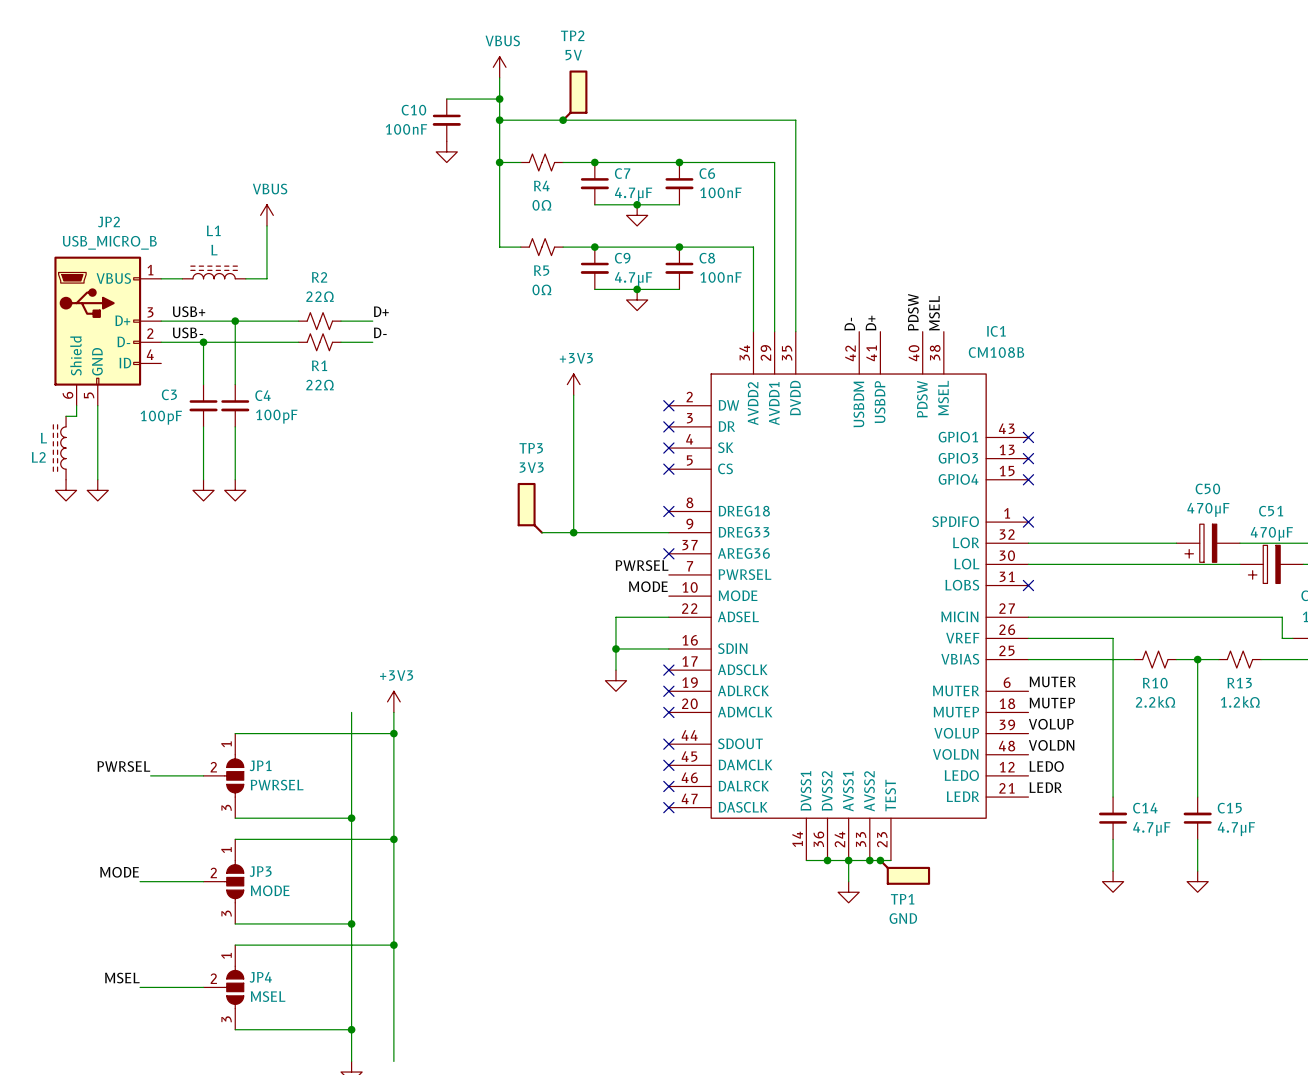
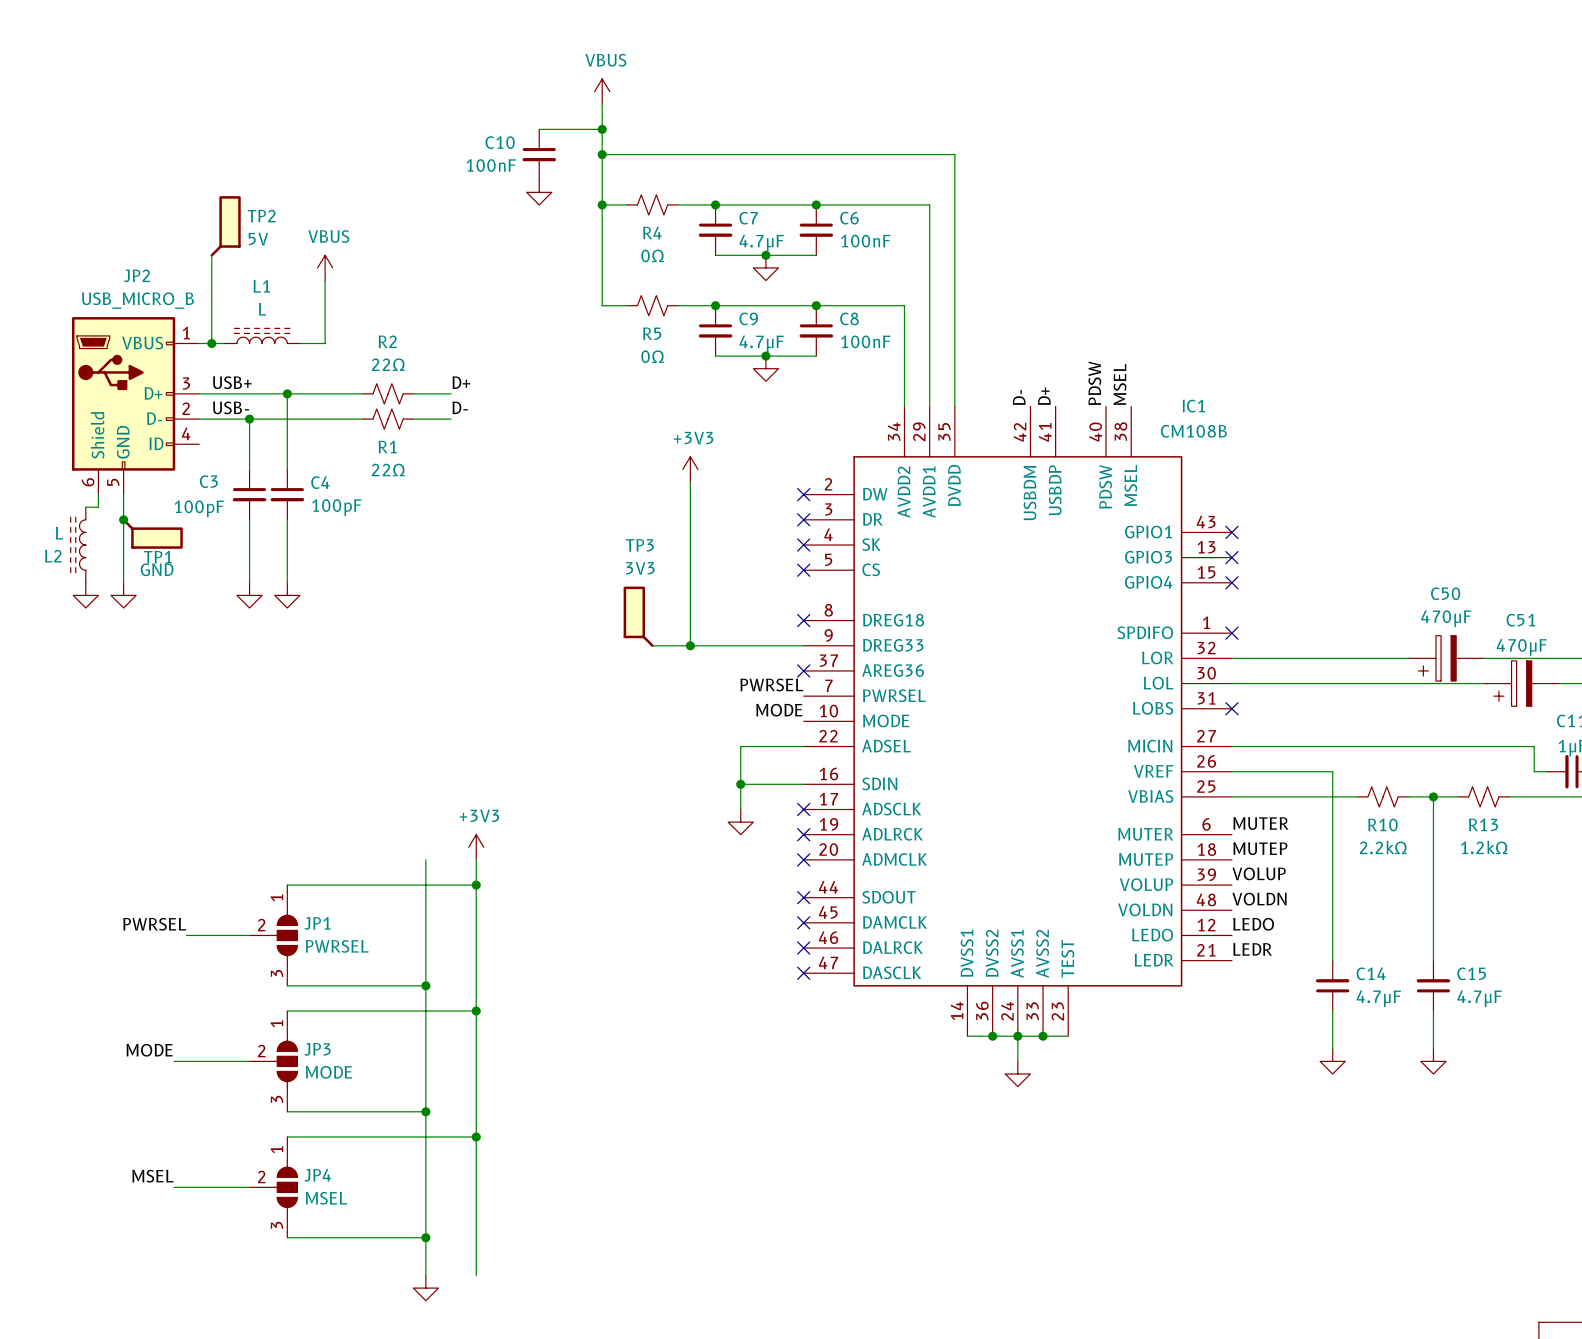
TP2 name position: TP2 (572, 35) -> TP2 (261, 216)
TP2 value position: 5V (573, 55) -> 5V (258, 239)
TP2 position: (574, 95) -> (225, 226)
junction: (563, 120) -> none
wire: none -> (211, 255) (211, 343)
junction: none -> (211, 343)
junction: none -> (123, 519)
junction: (880, 860) -> none
TP1 position: (904, 872) -> (152, 533)
TP1 name position: TP1 (902, 899) -> TP1 (157, 557)
TP1 value position: GND (903, 918) -> GND (157, 569)

